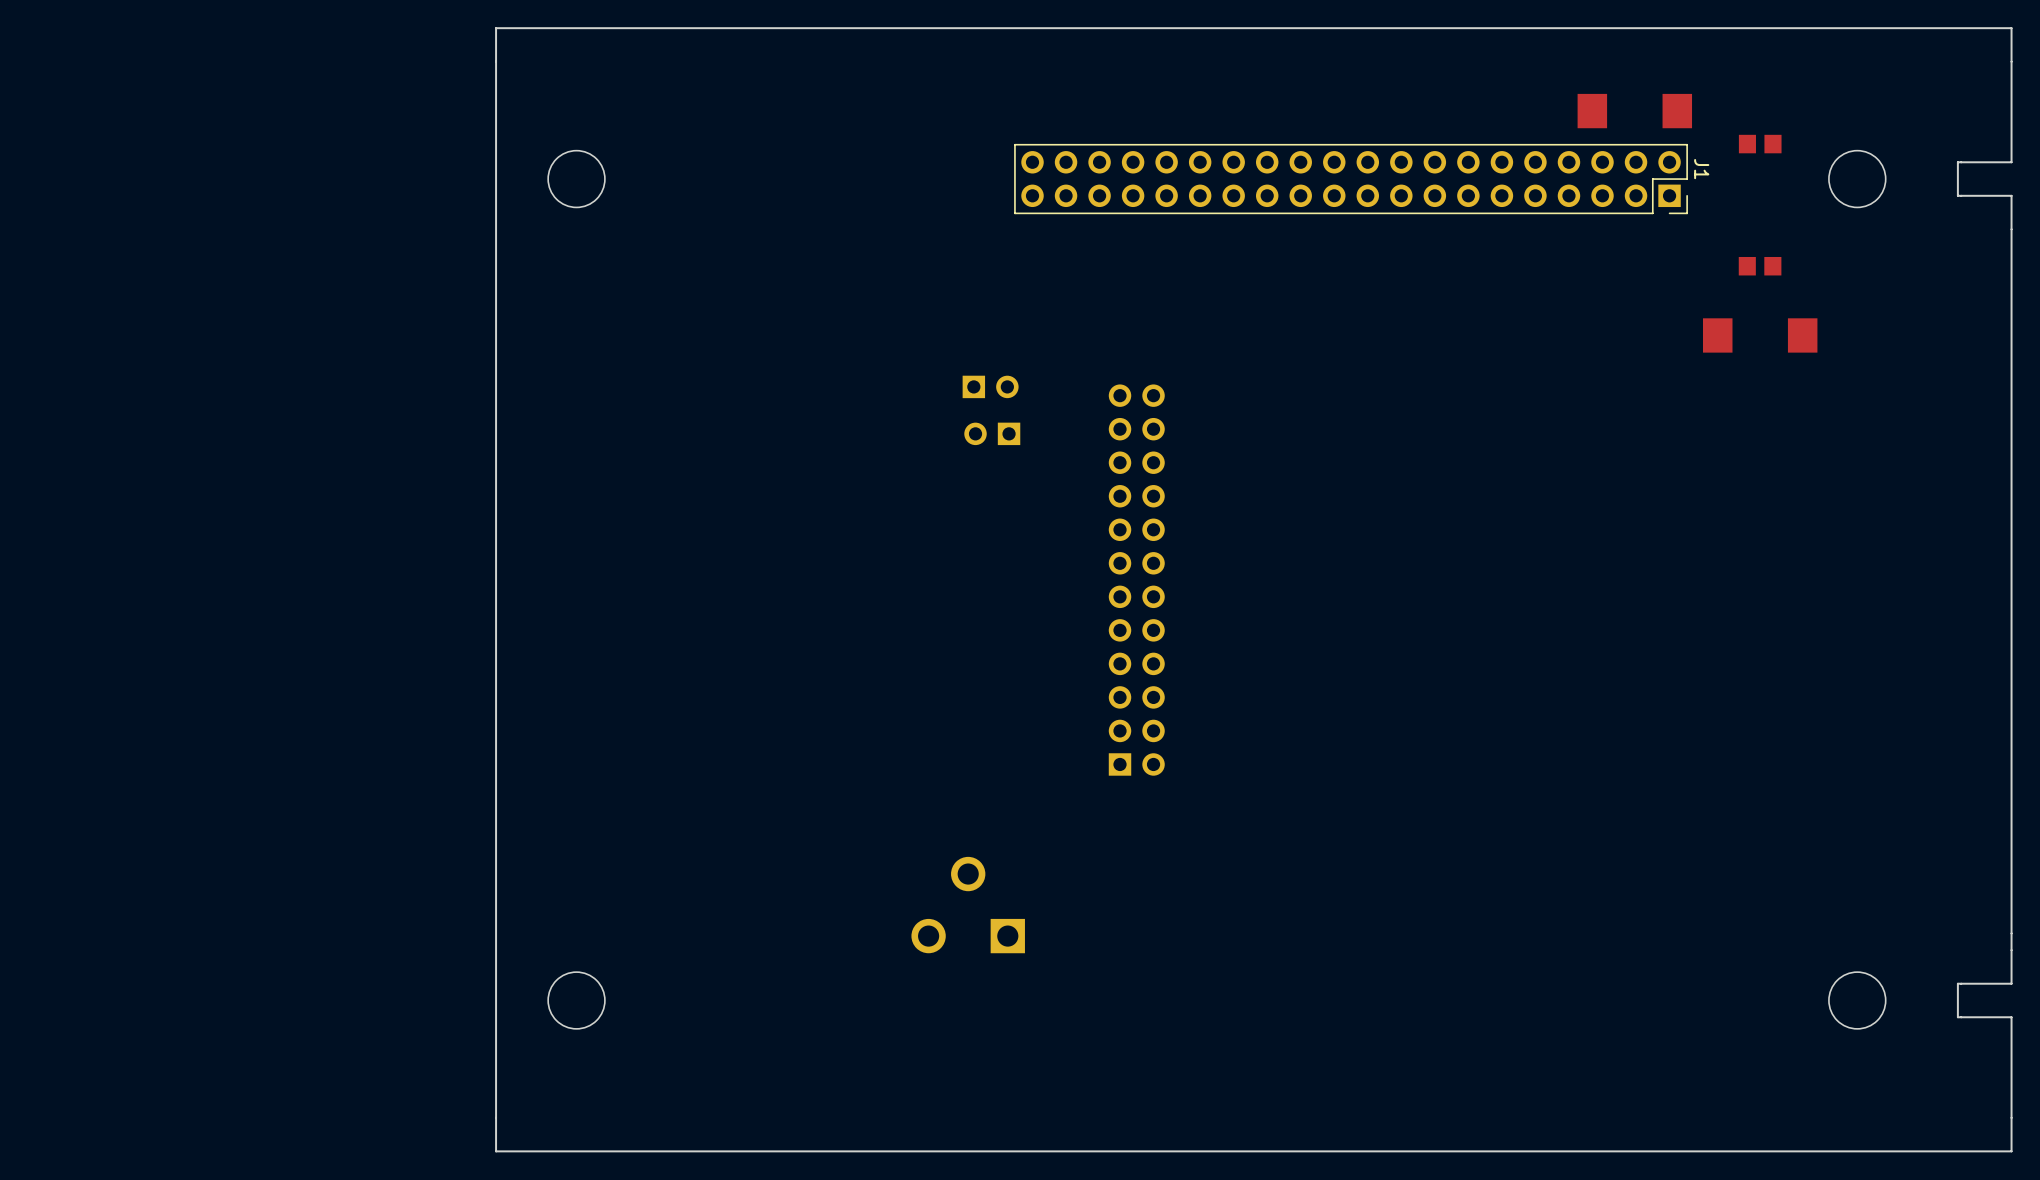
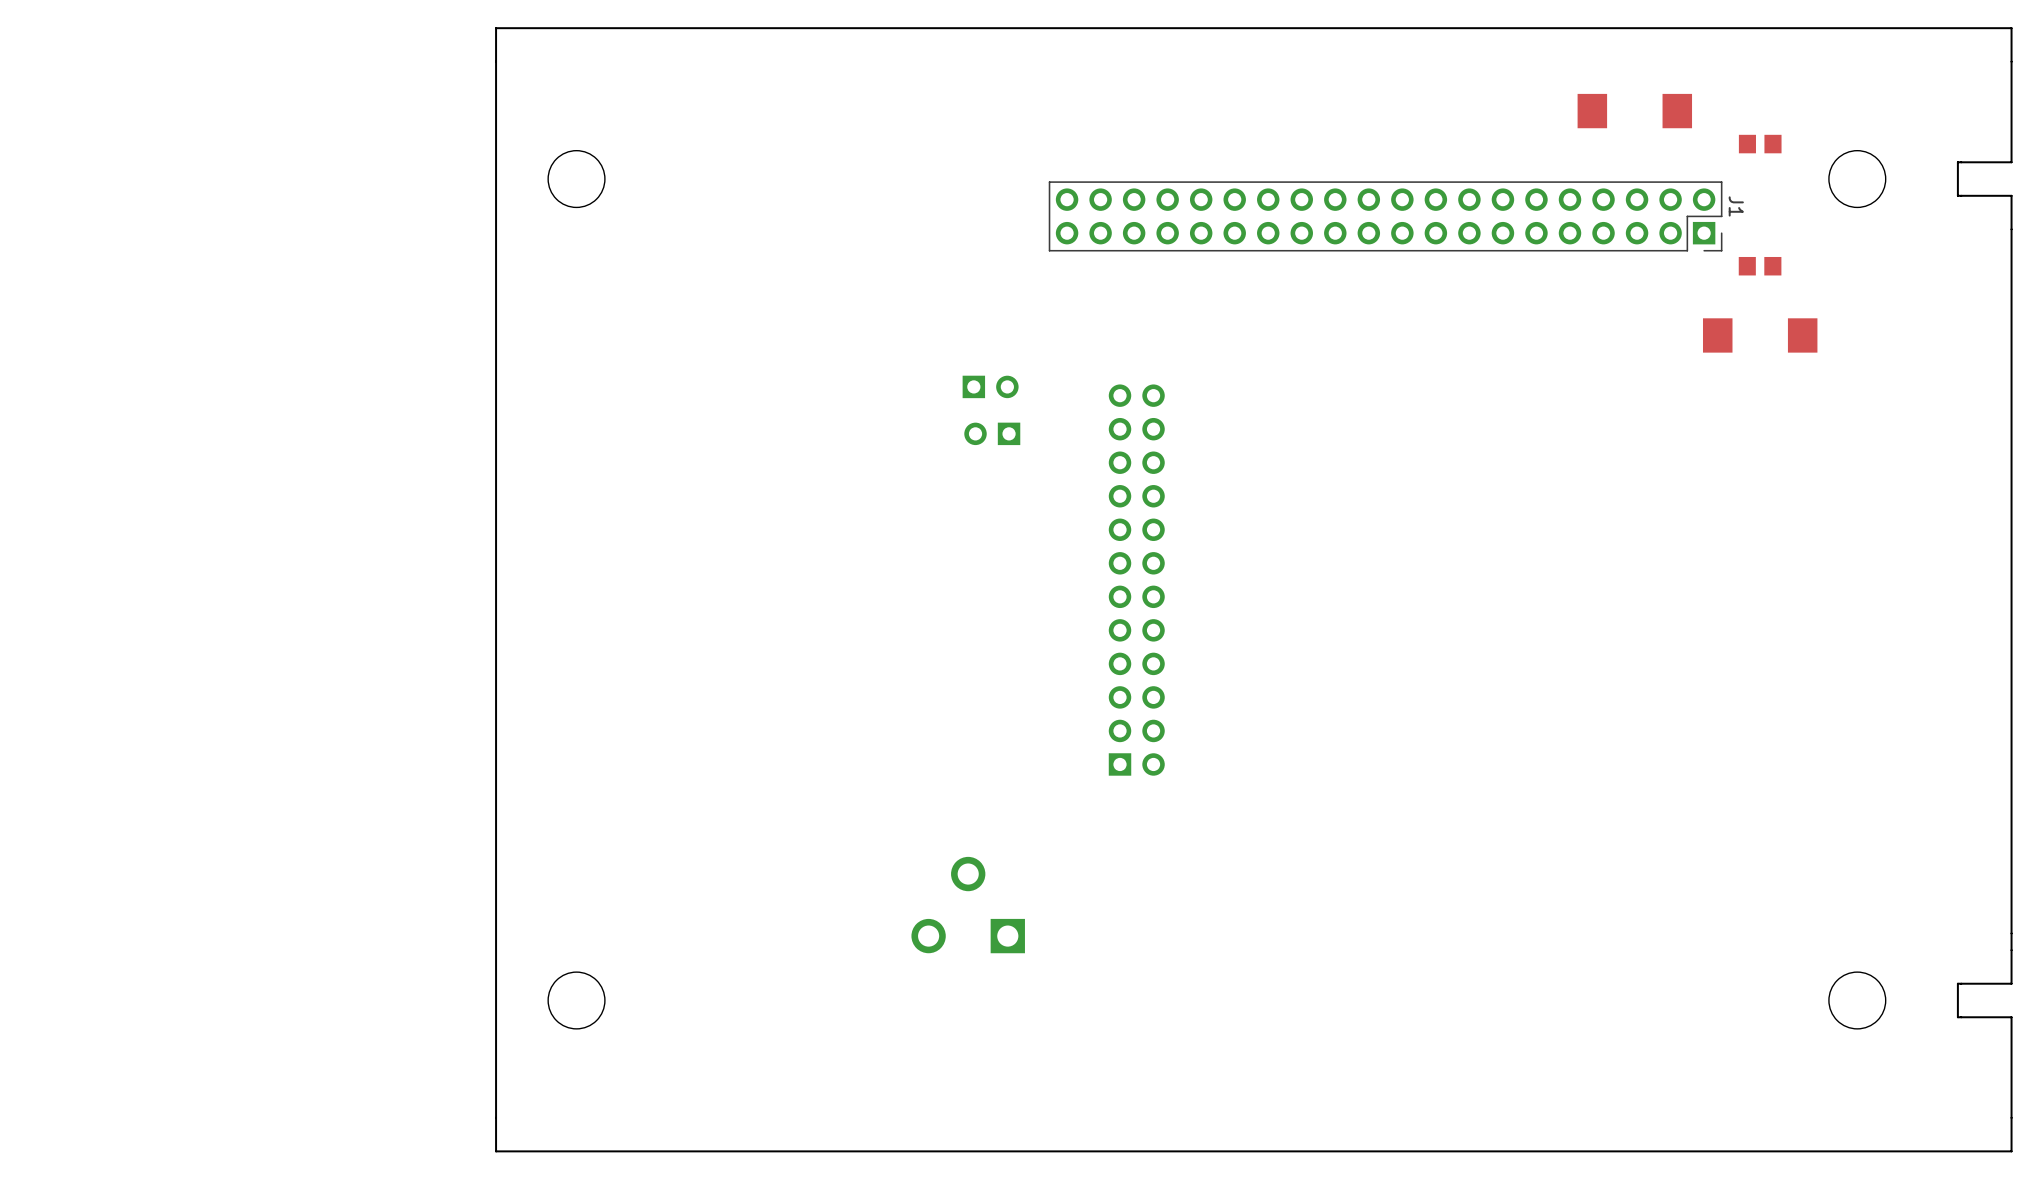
J1 position: (1351, 179) -> (1385, 216)

